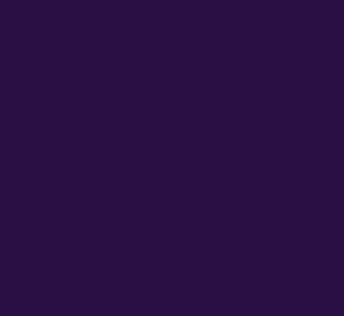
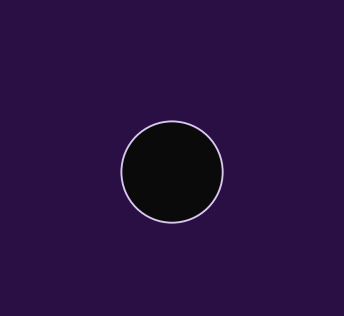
part: none -> (172, 172)

